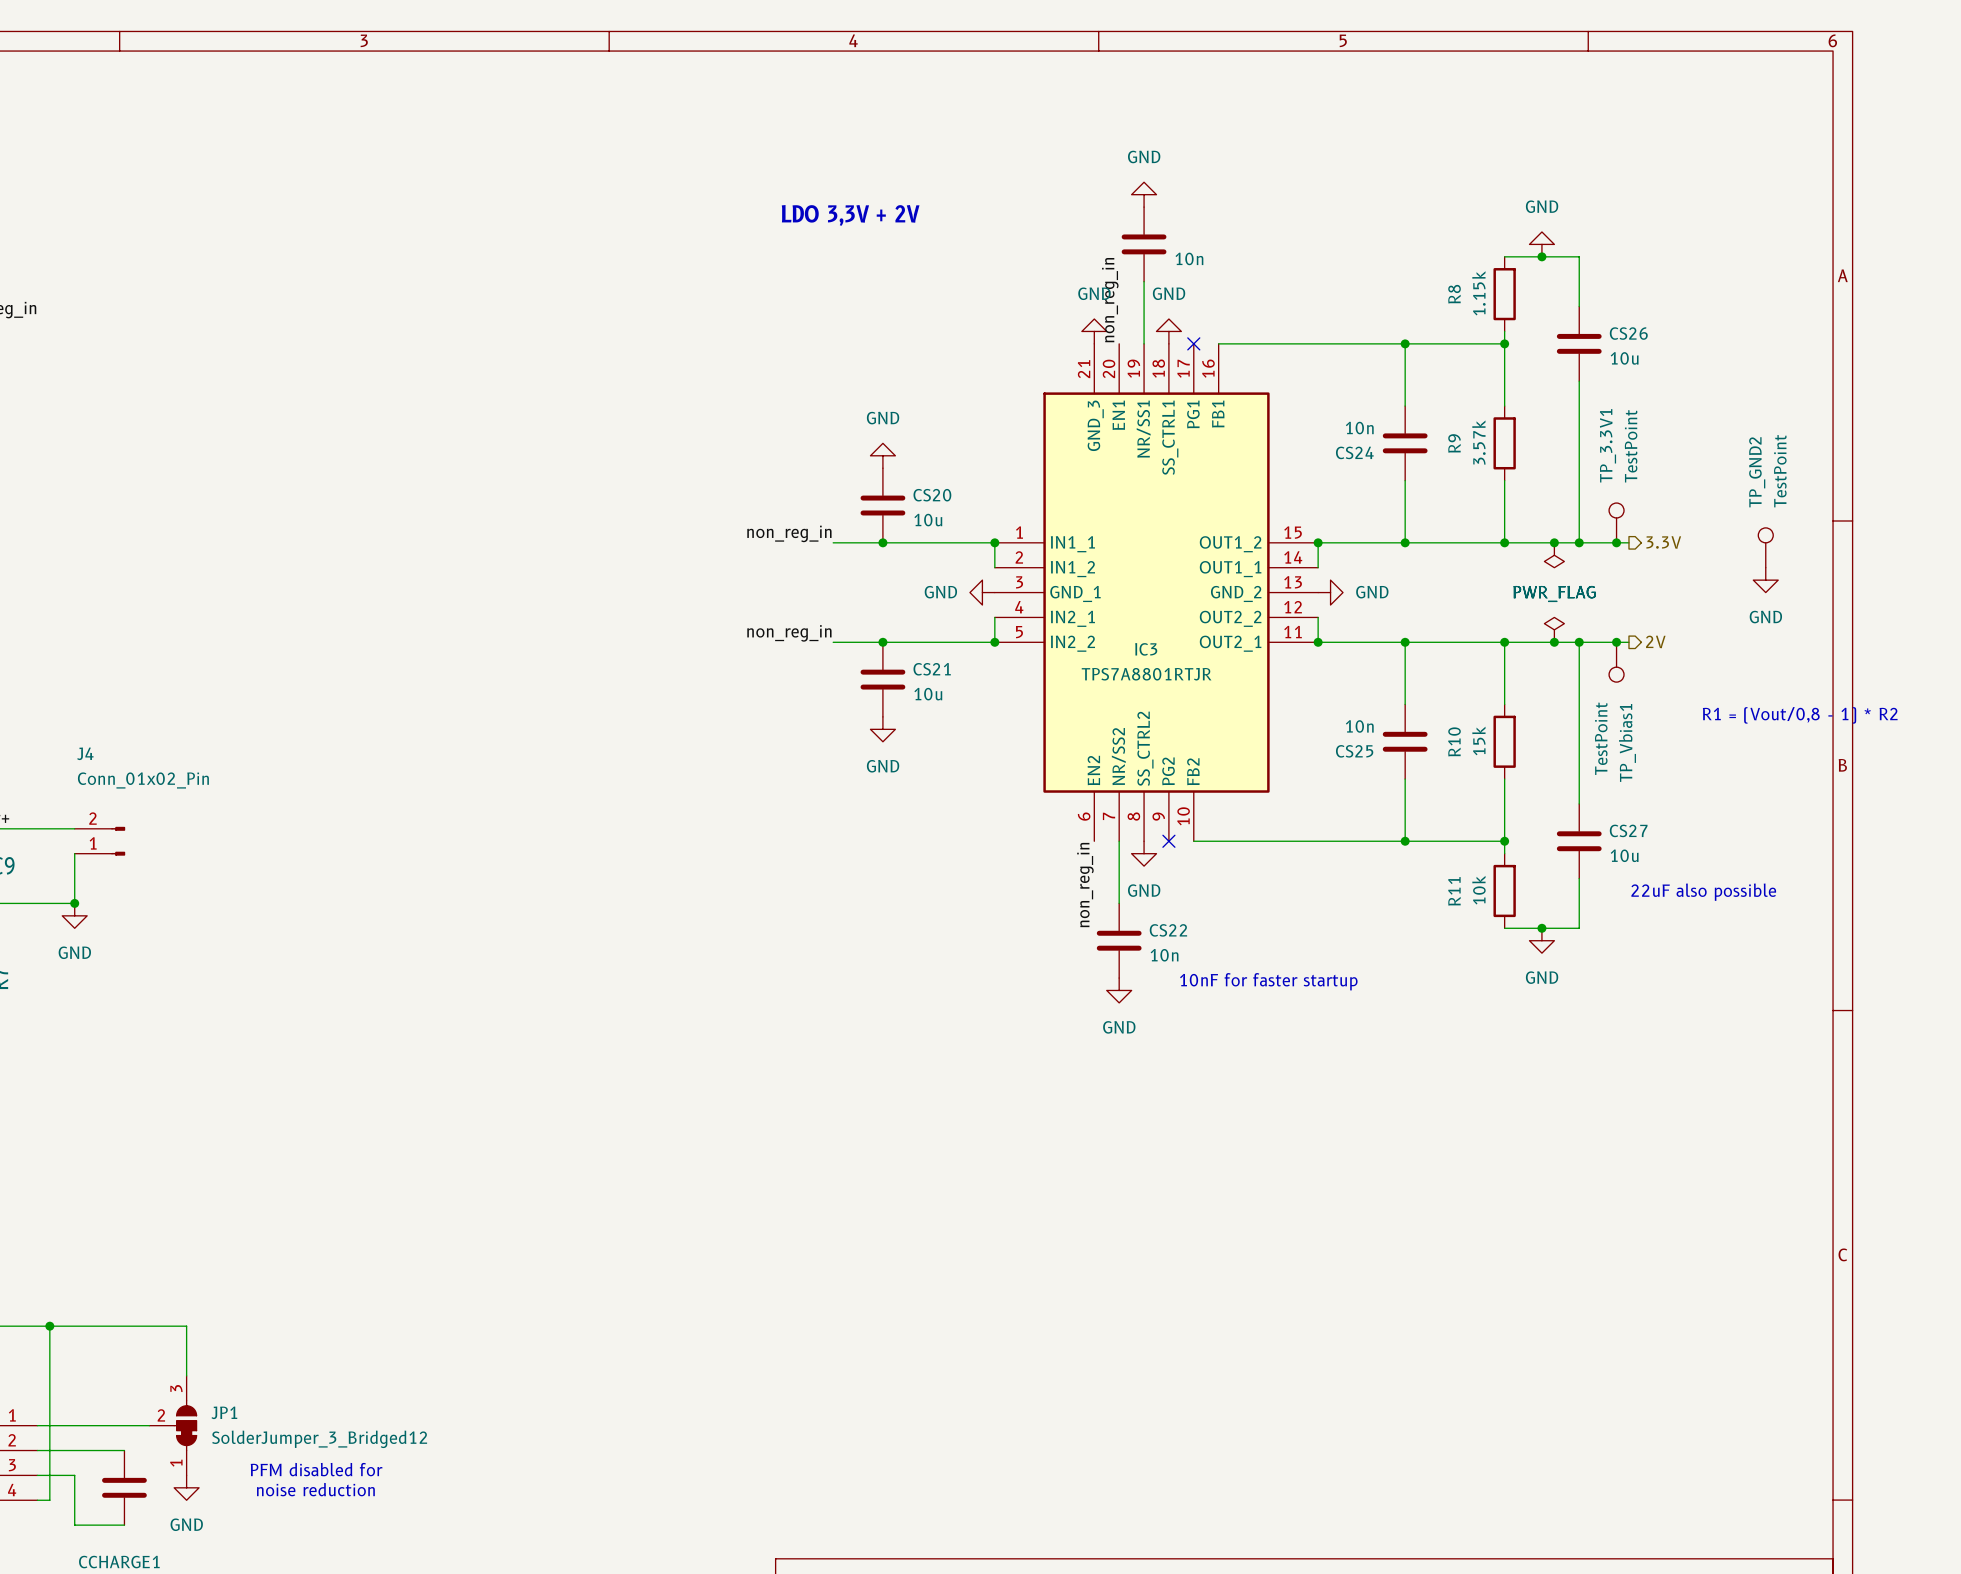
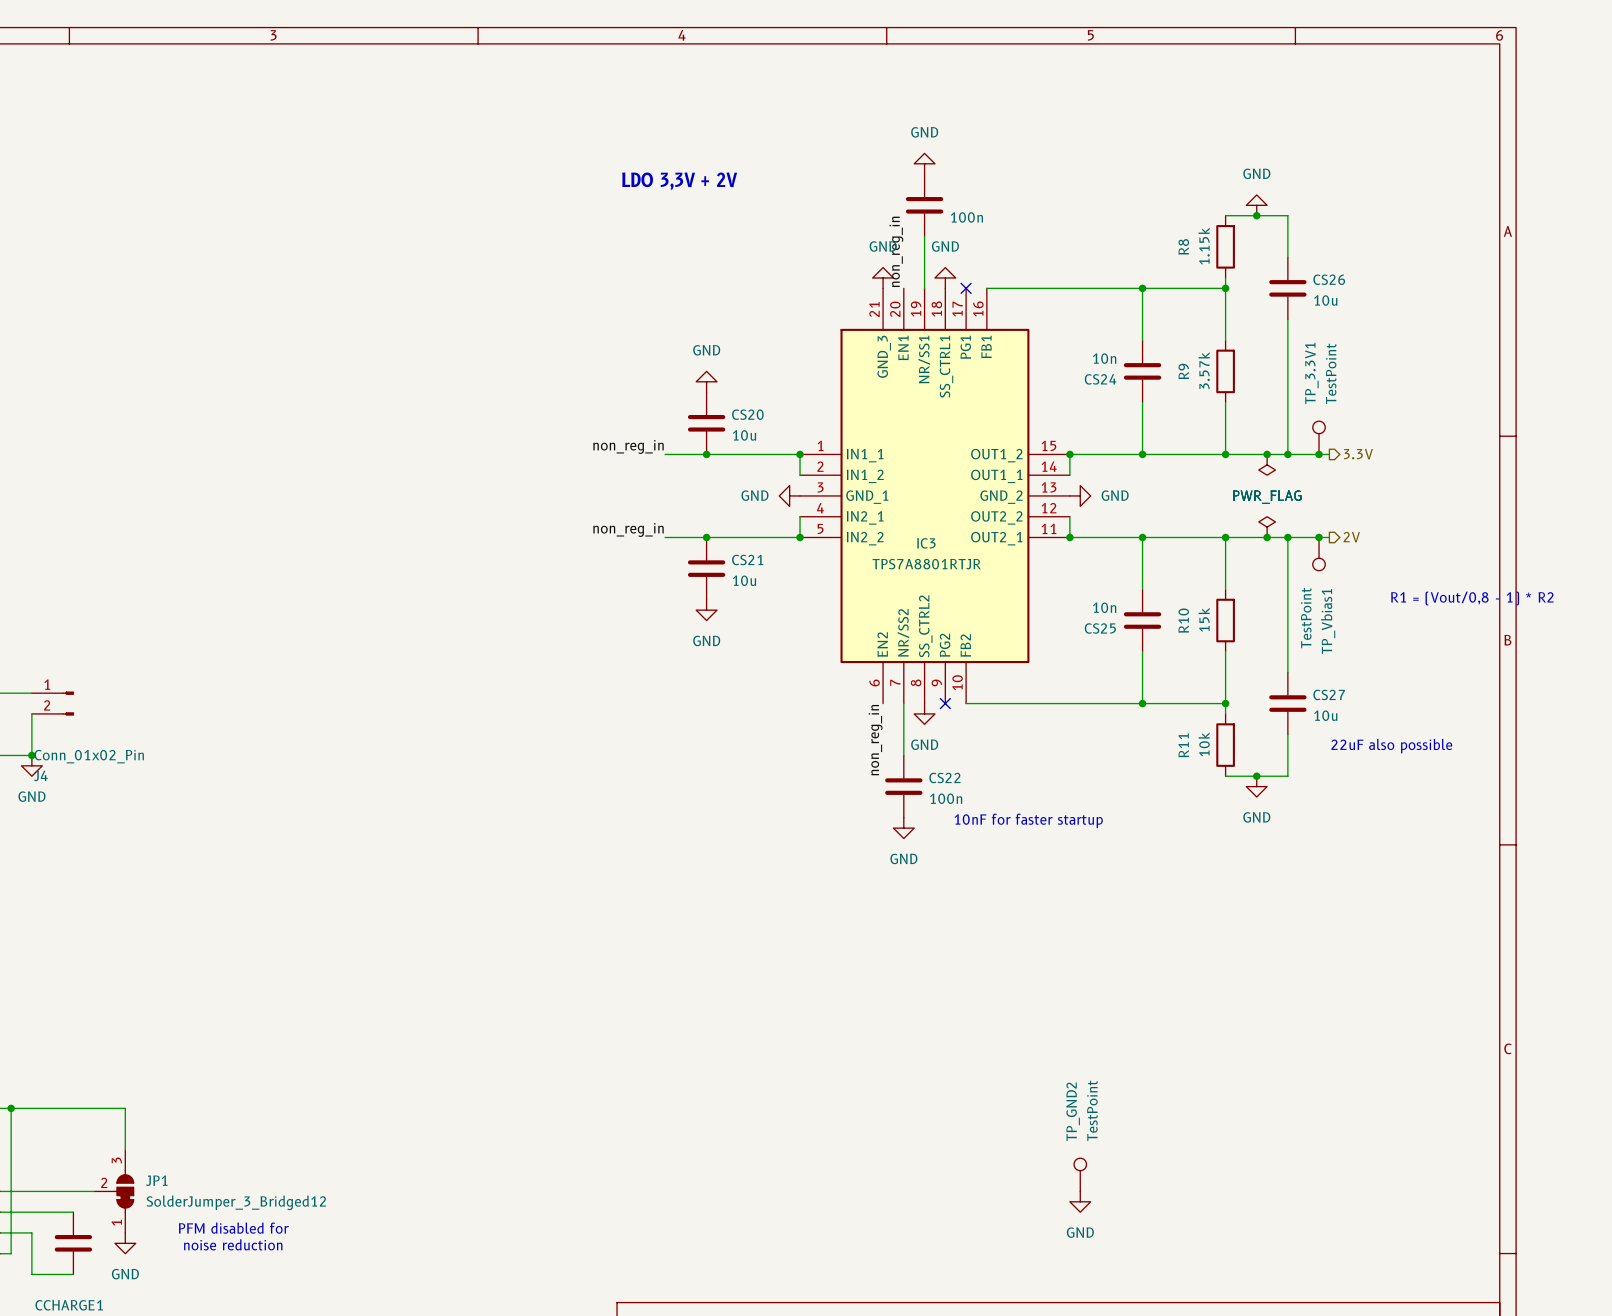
part value: 10n (1189, 258) -> 100n (966, 217)
TP_GND2 position: (1765, 547) -> (1080, 1174)
power symbol: GND (1765, 580) -> none
J4 flip: as is (118, 841) -> up-down (68, 703)
CS22 value: 10n (1164, 955) -> 100n (946, 798)
power symbol: none -> GND (1080, 1201)

